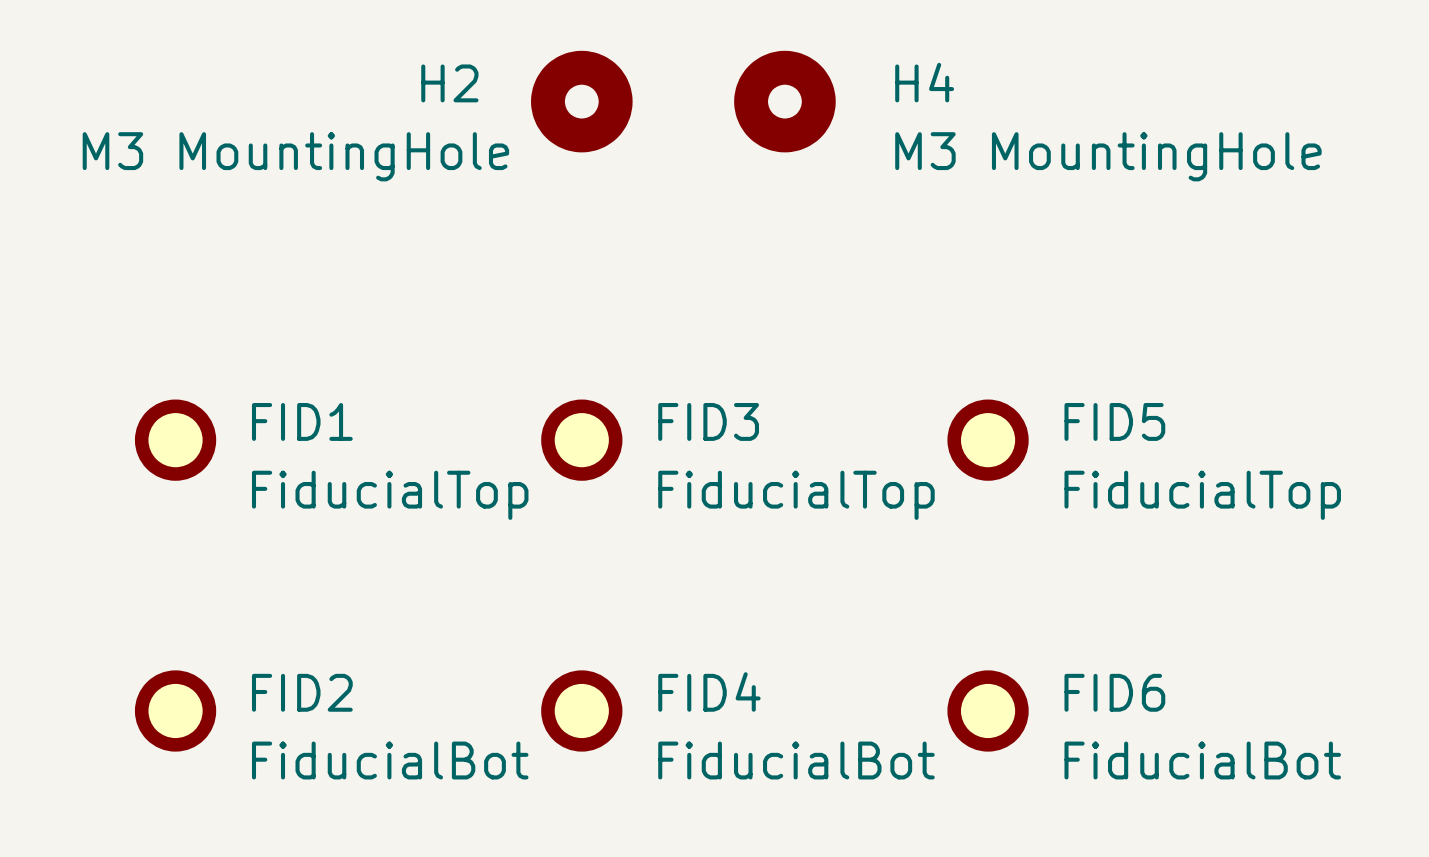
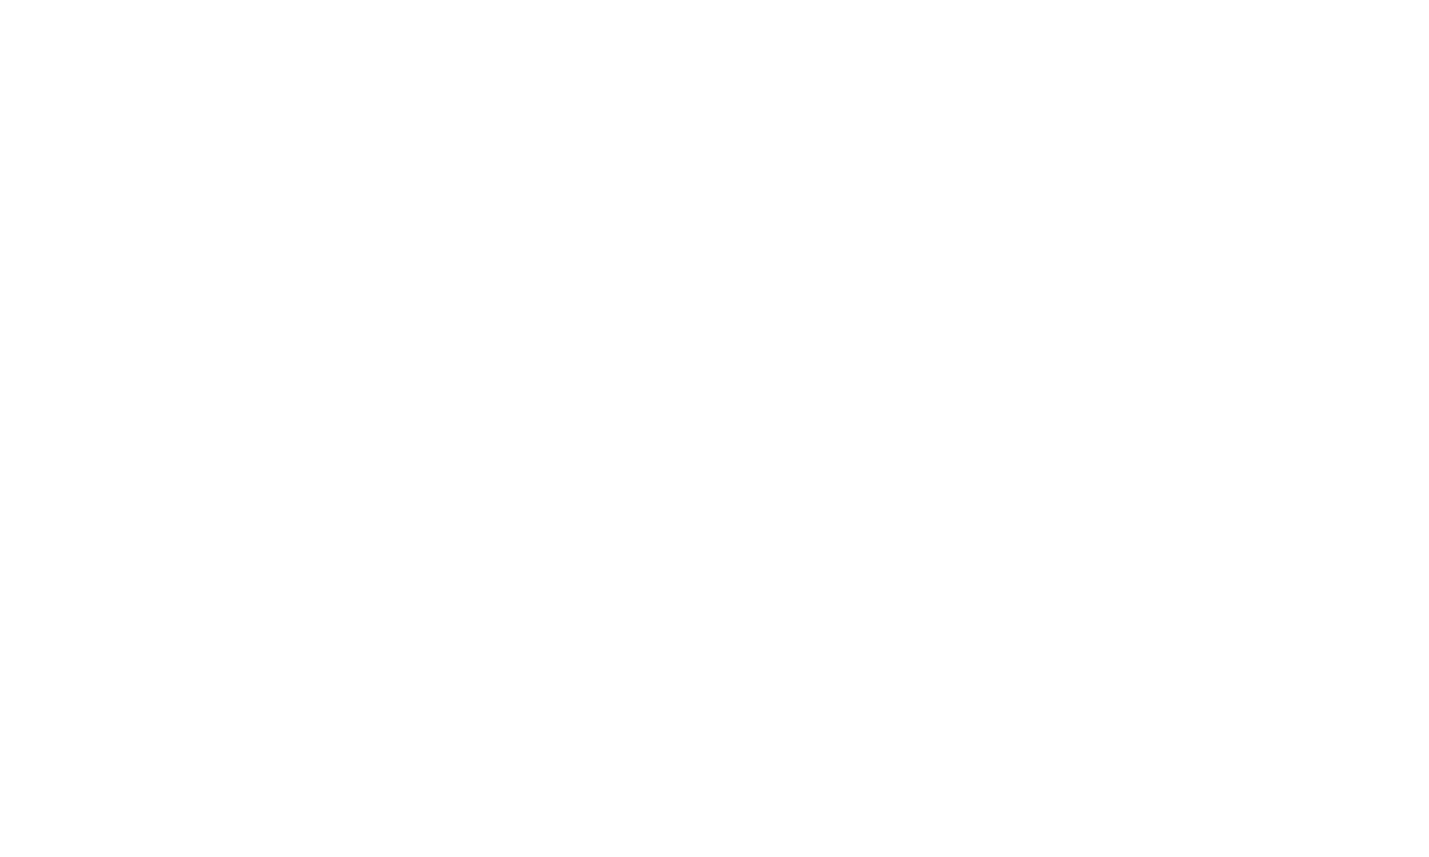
H2: M3 MountingHole (581, 101) -> none
H4: M3 MountingHole (784, 101) -> none
FID1: FiducialTop (175, 440) -> none
FID3: FiducialTop (581, 440) -> none
FID5: FiducialTop (988, 440) -> none
FID2: FiducialBot (175, 710) -> none
FID4: FiducialBot (581, 710) -> none
FID6: FiducialBot (988, 710) -> none

